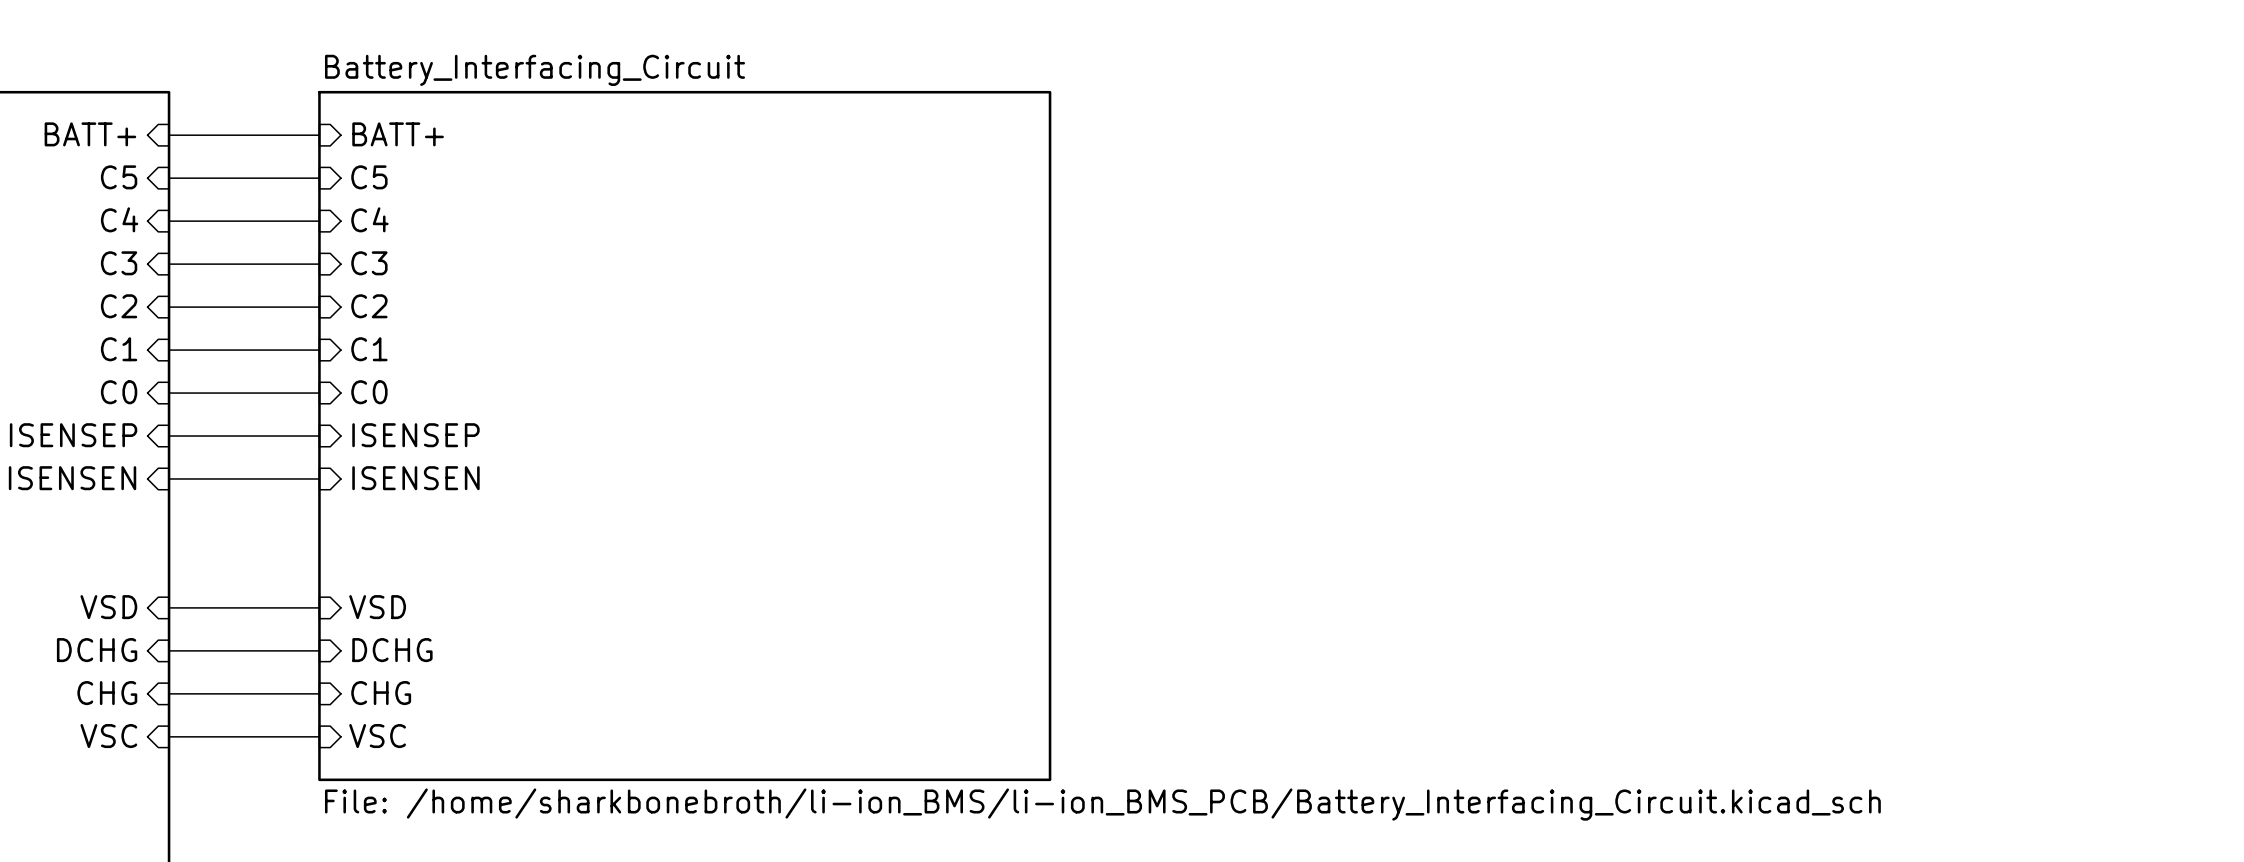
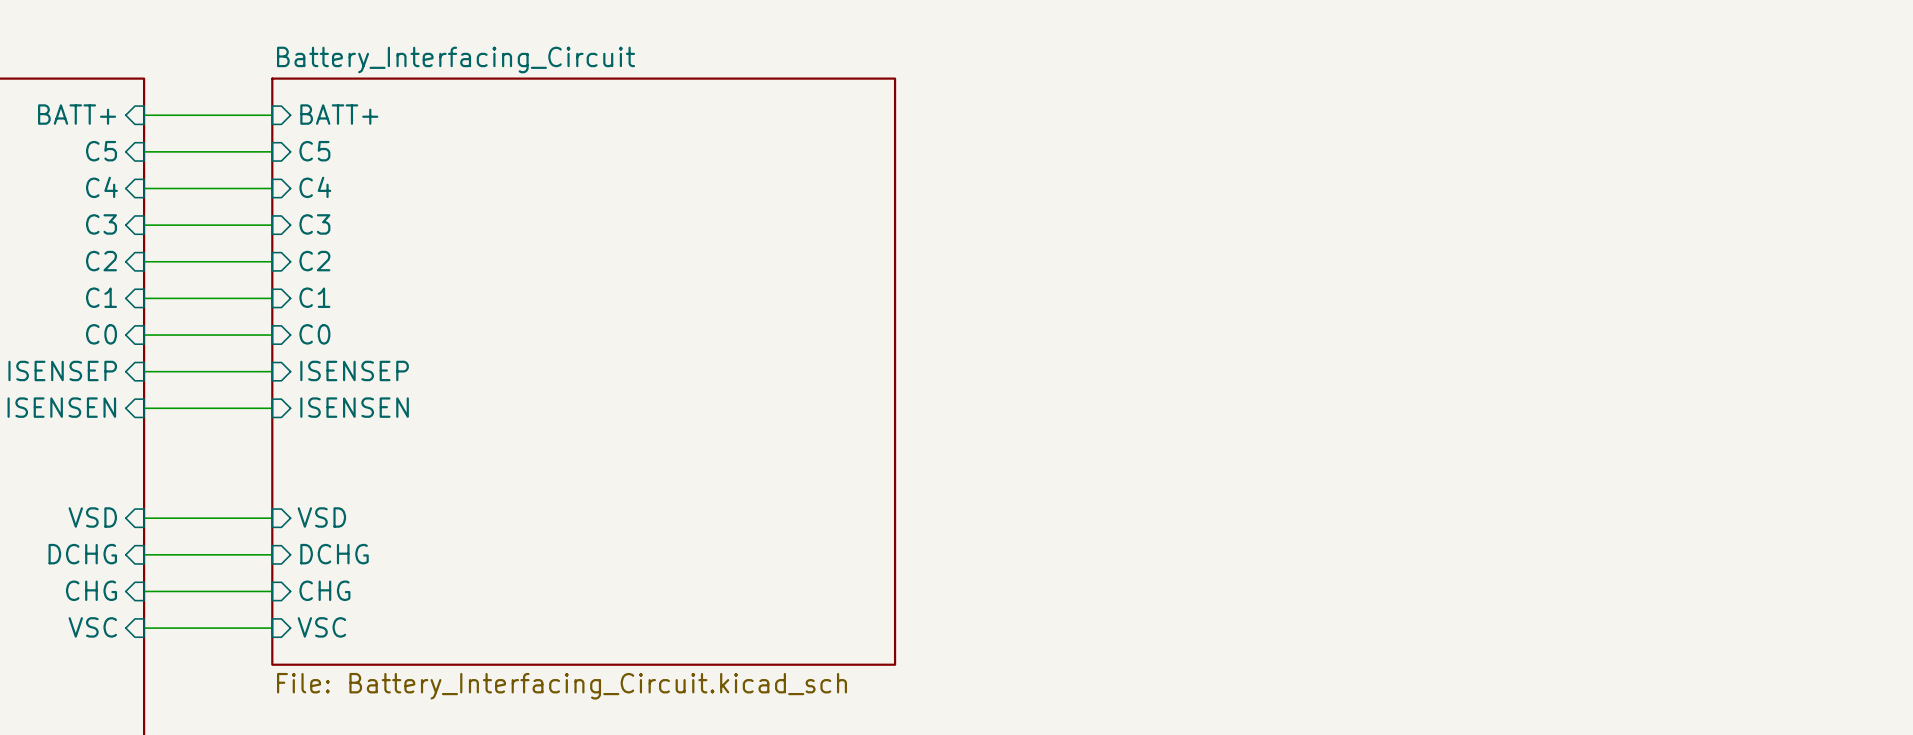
sheet Battery_Interfacing_Circuit value: File: /home/sharkbonebroth/li-ion_BMS/li-ion_BMS_PCB/Battery_Interfacing_Circuit.kicad_sch (1102, 804) -> File: Battery_Interfacing_Circuit.kicad_sch (562, 686)

